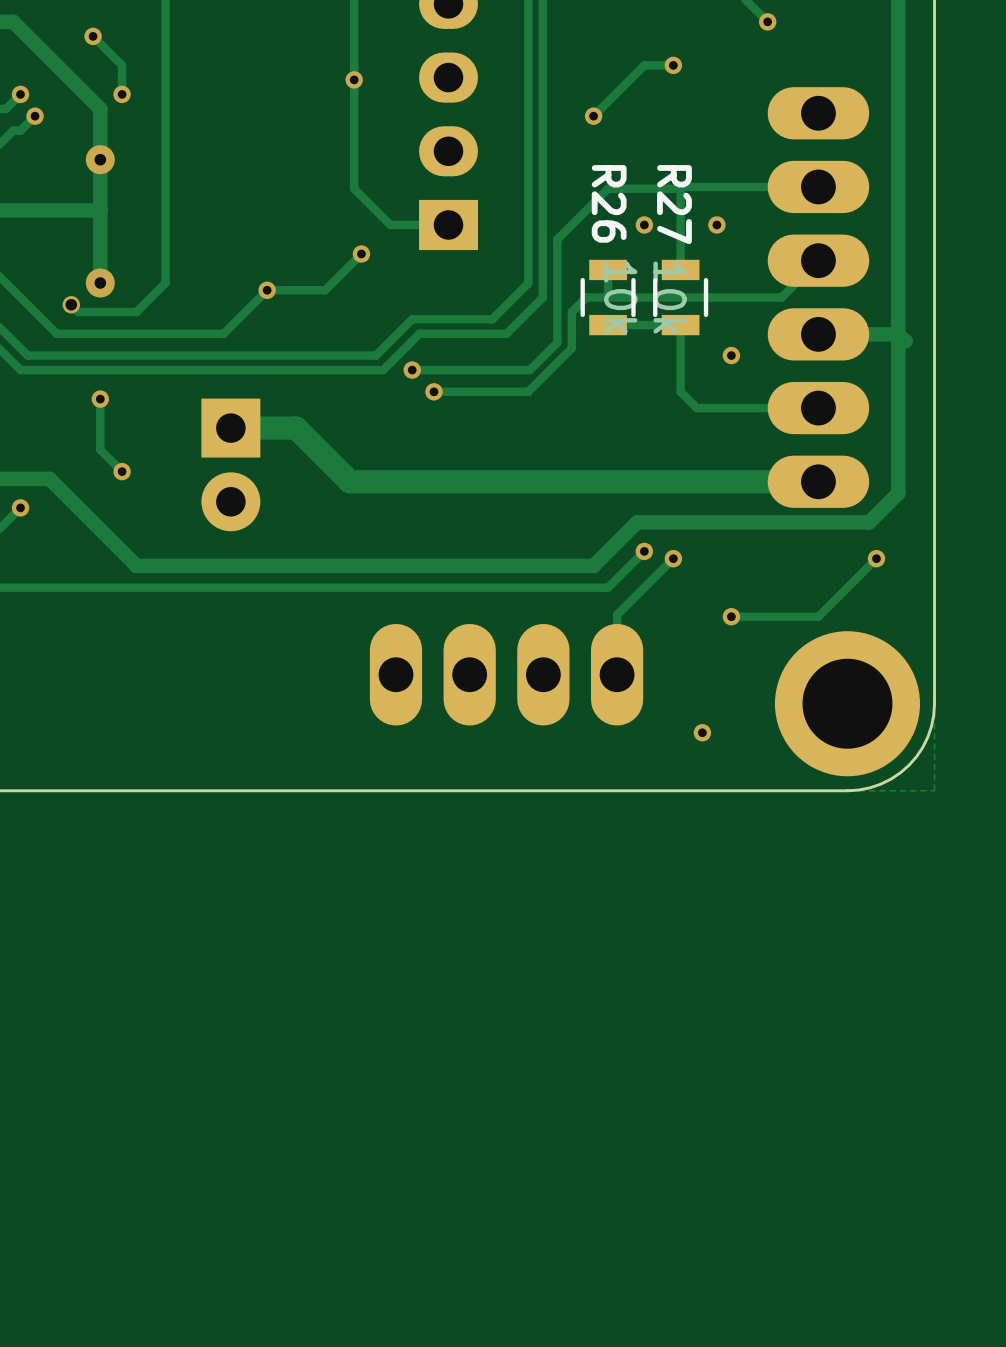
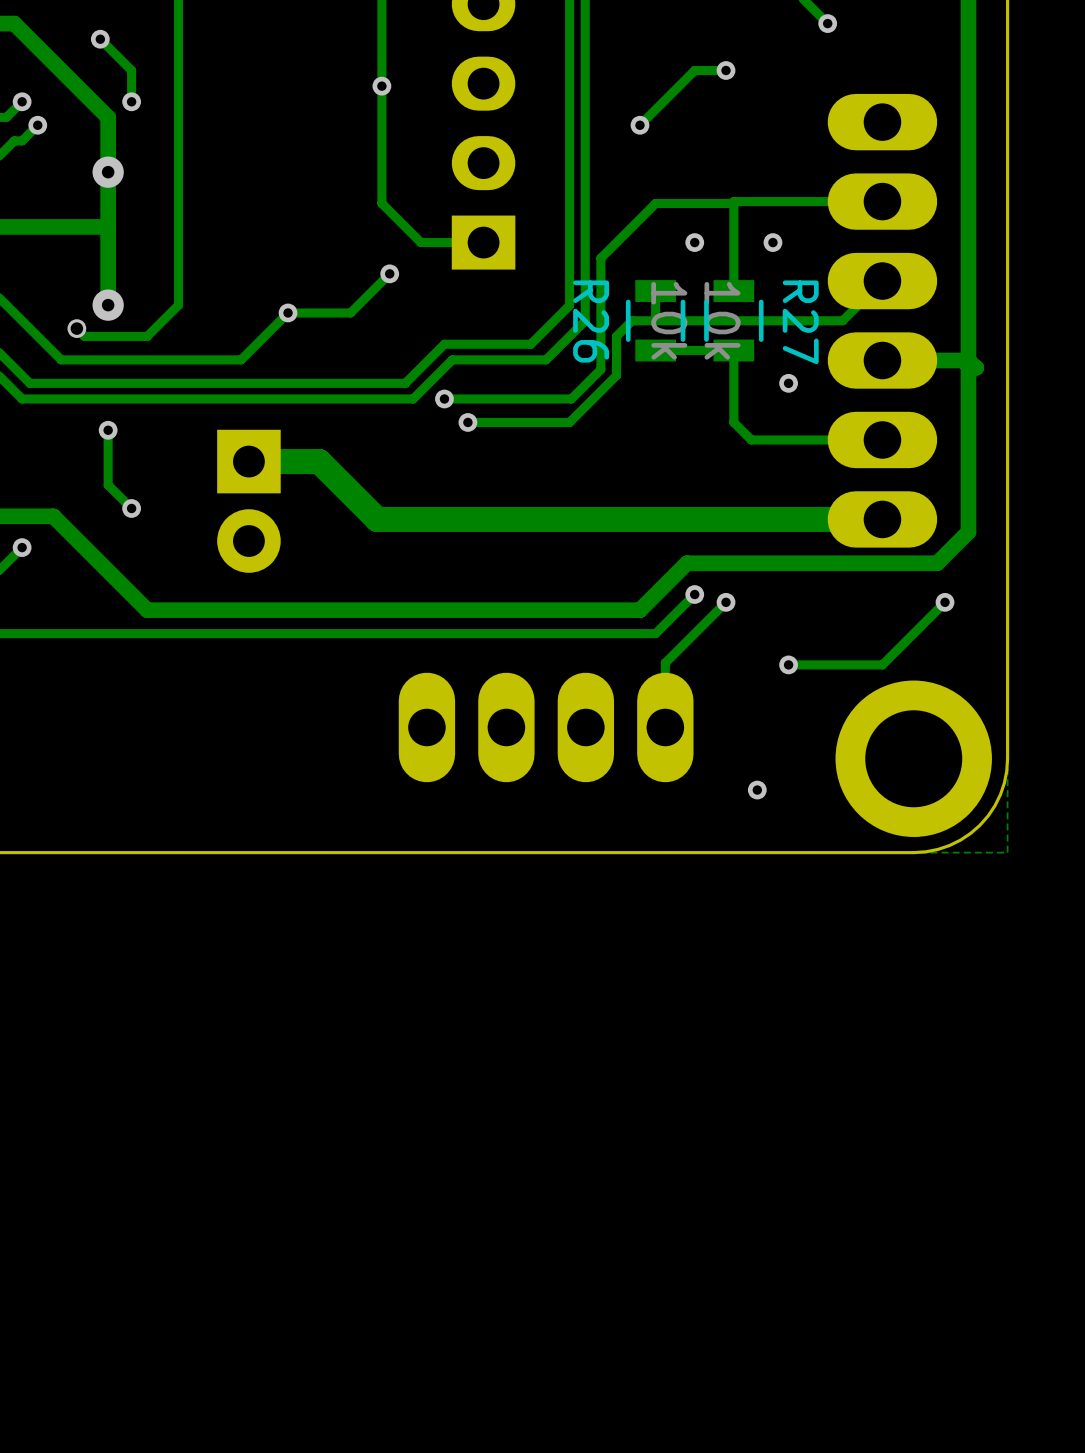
R26 name position: R26 (609, 203) -> R26 (591, 321)
R27 name position: R27 (674, 204) -> R27 (800, 322)

